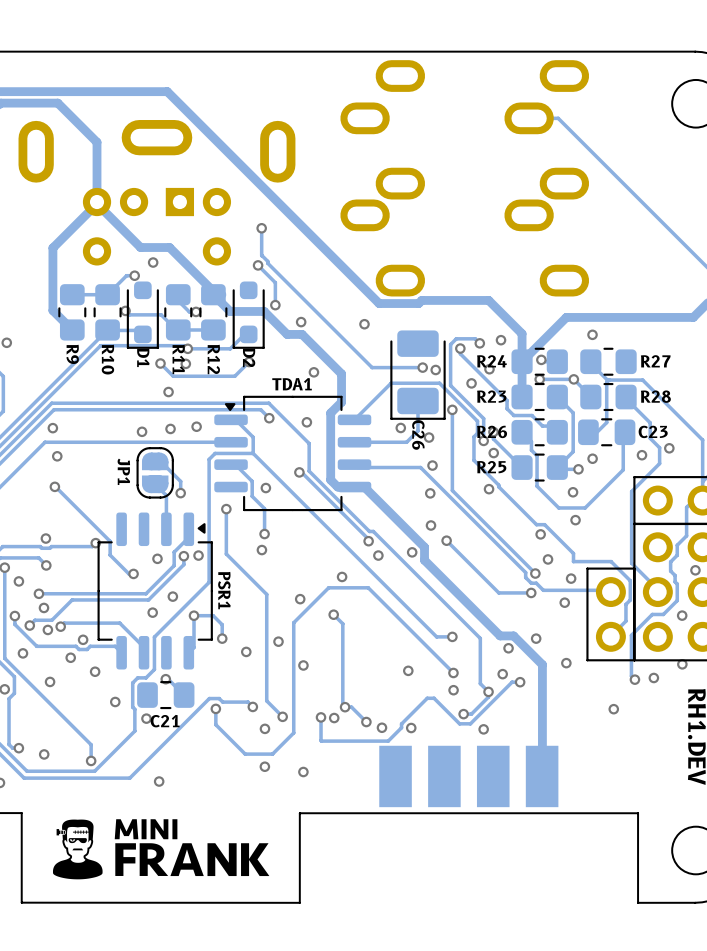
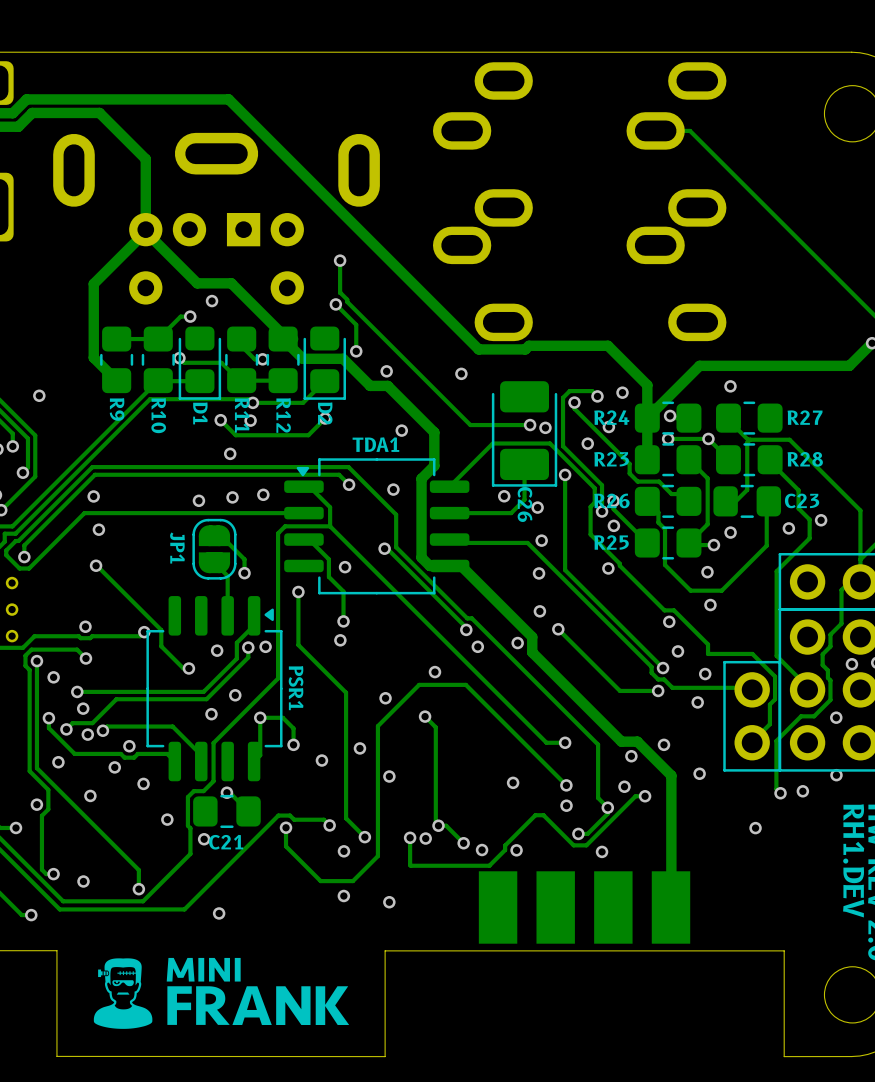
D1 footprint: [126, 281, 159, 349] -> [178, 326, 222, 400]
D2 footprint: [232, 281, 265, 349] -> [303, 326, 346, 400]

